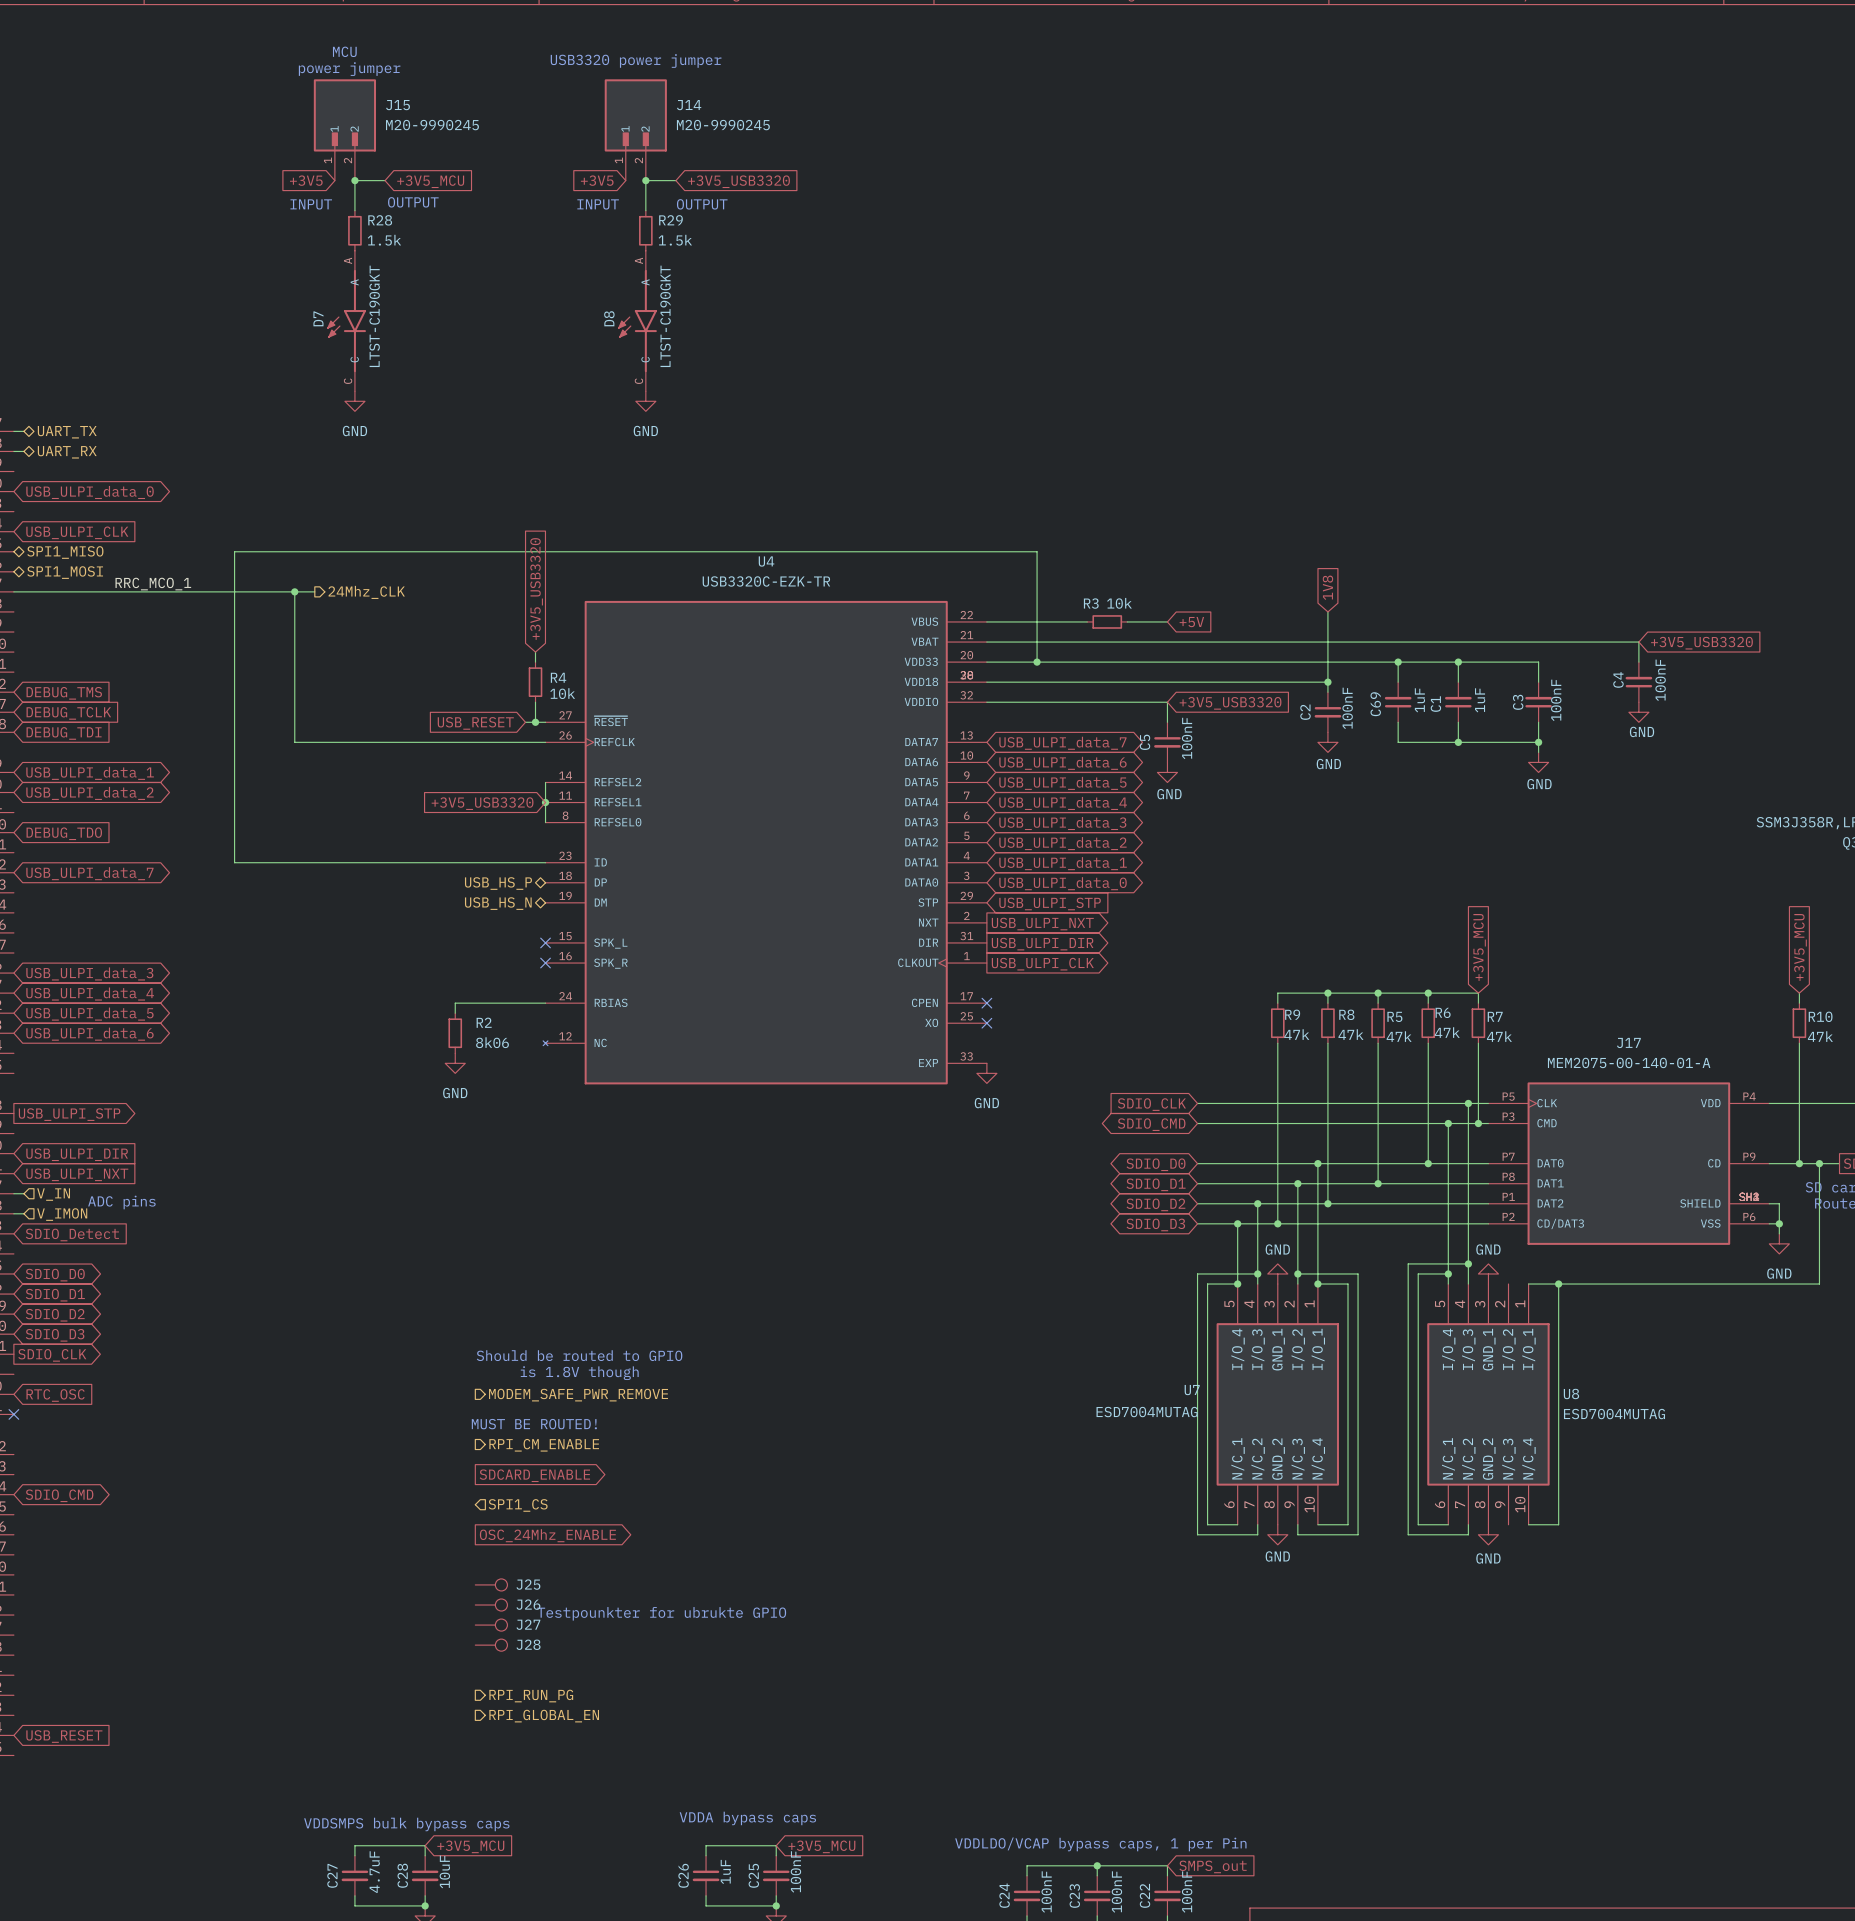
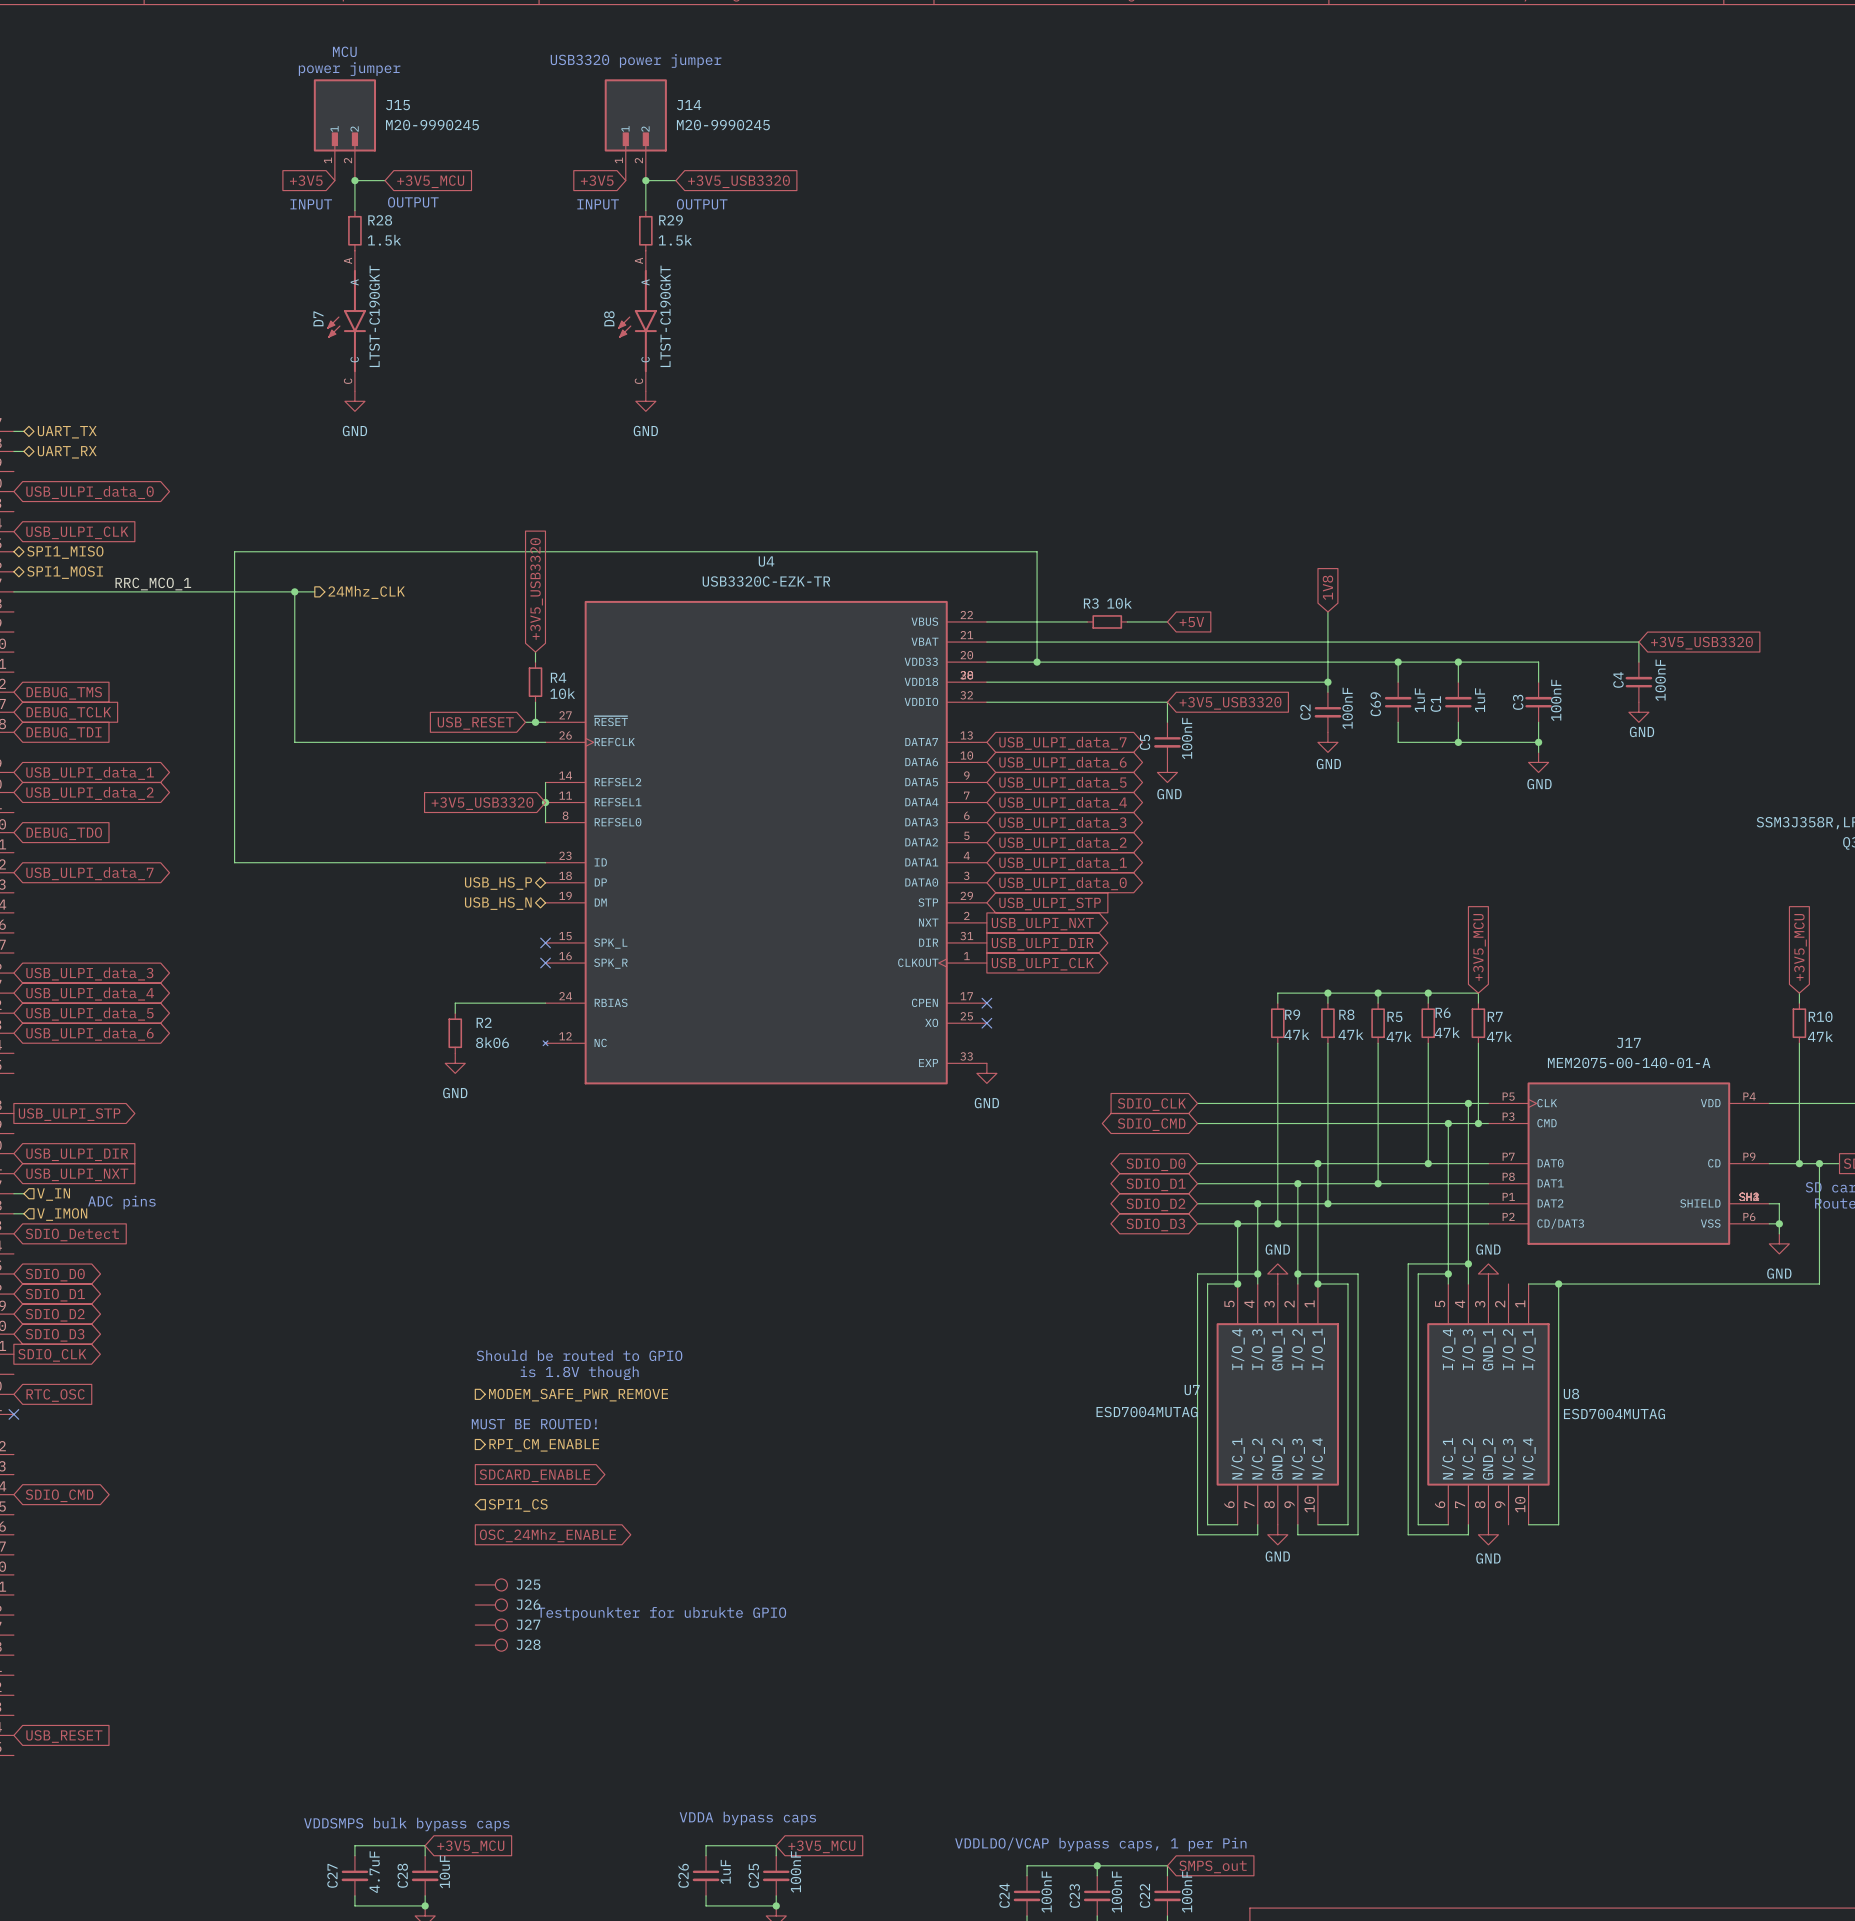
hierarchical label: RPI_RUN_PG (531, 1696) -> none
hierarchical label: RPI_GLOBAL_EN (544, 1716) -> none

